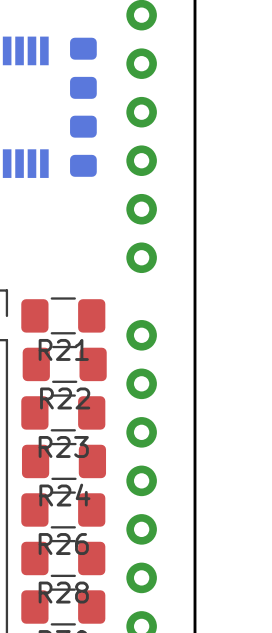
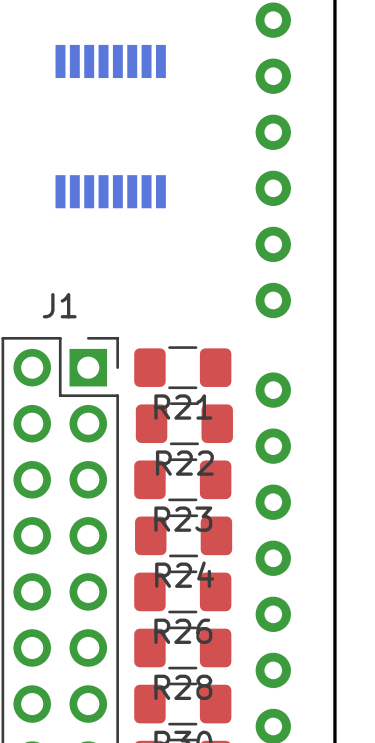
part: (83, 68) -> none
part: (83, 146) -> none

